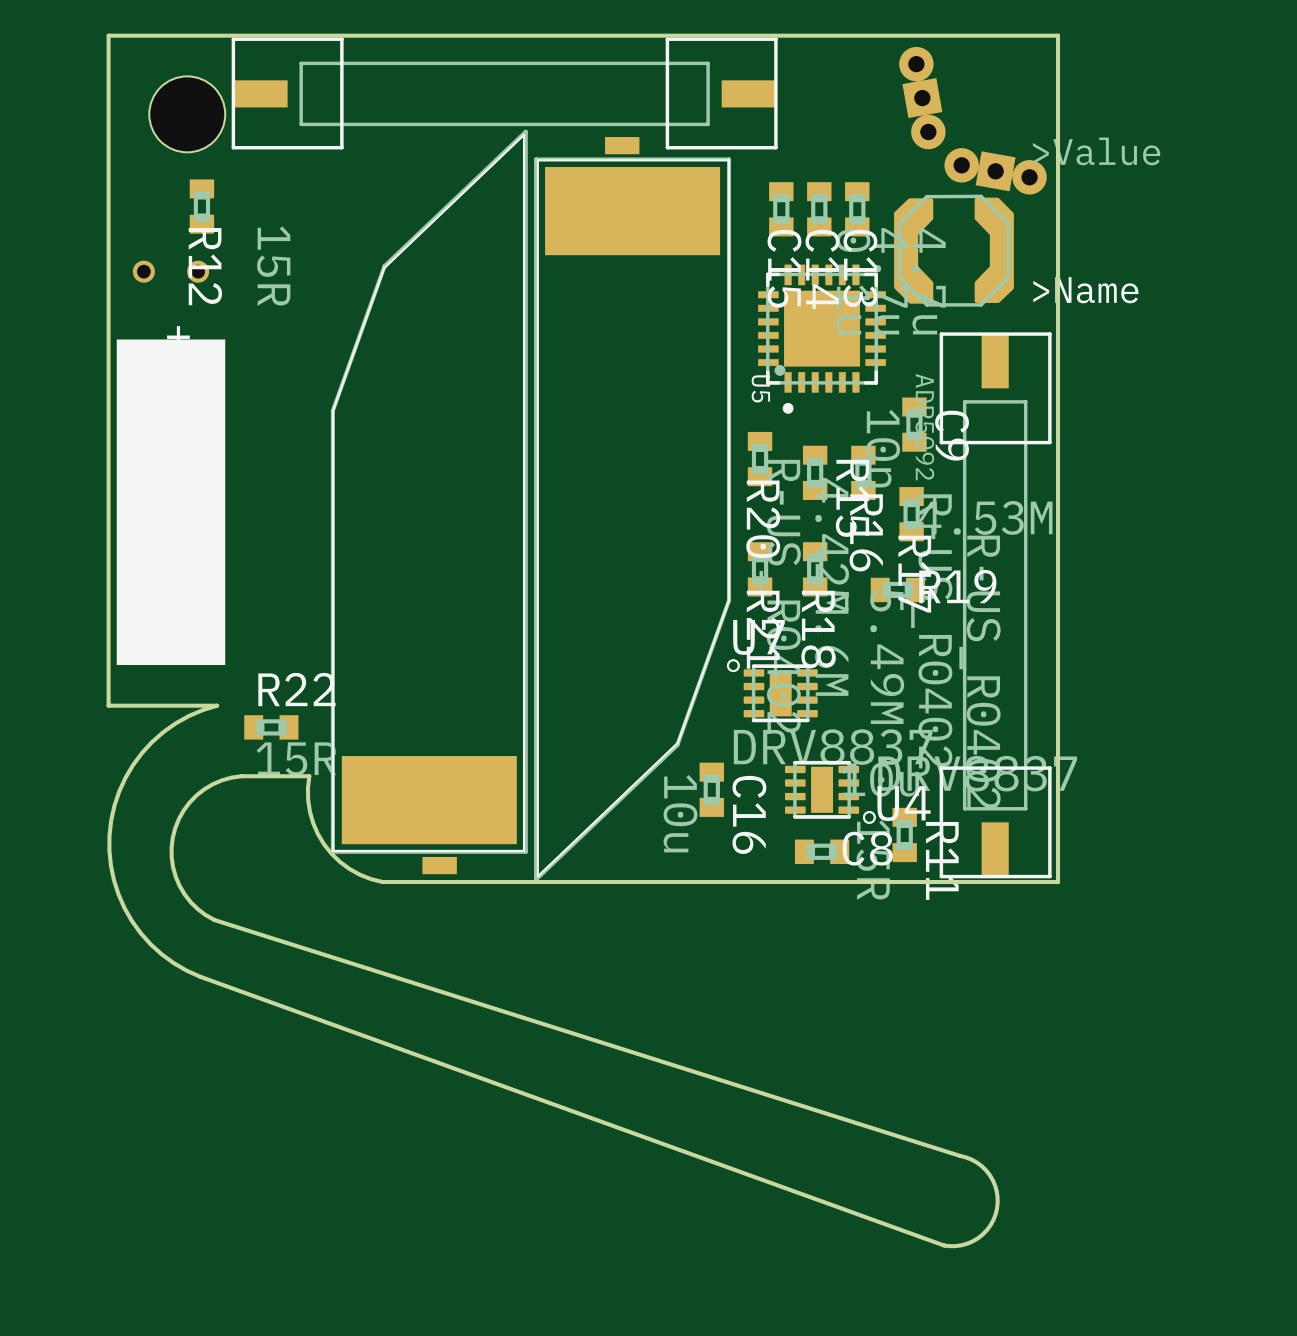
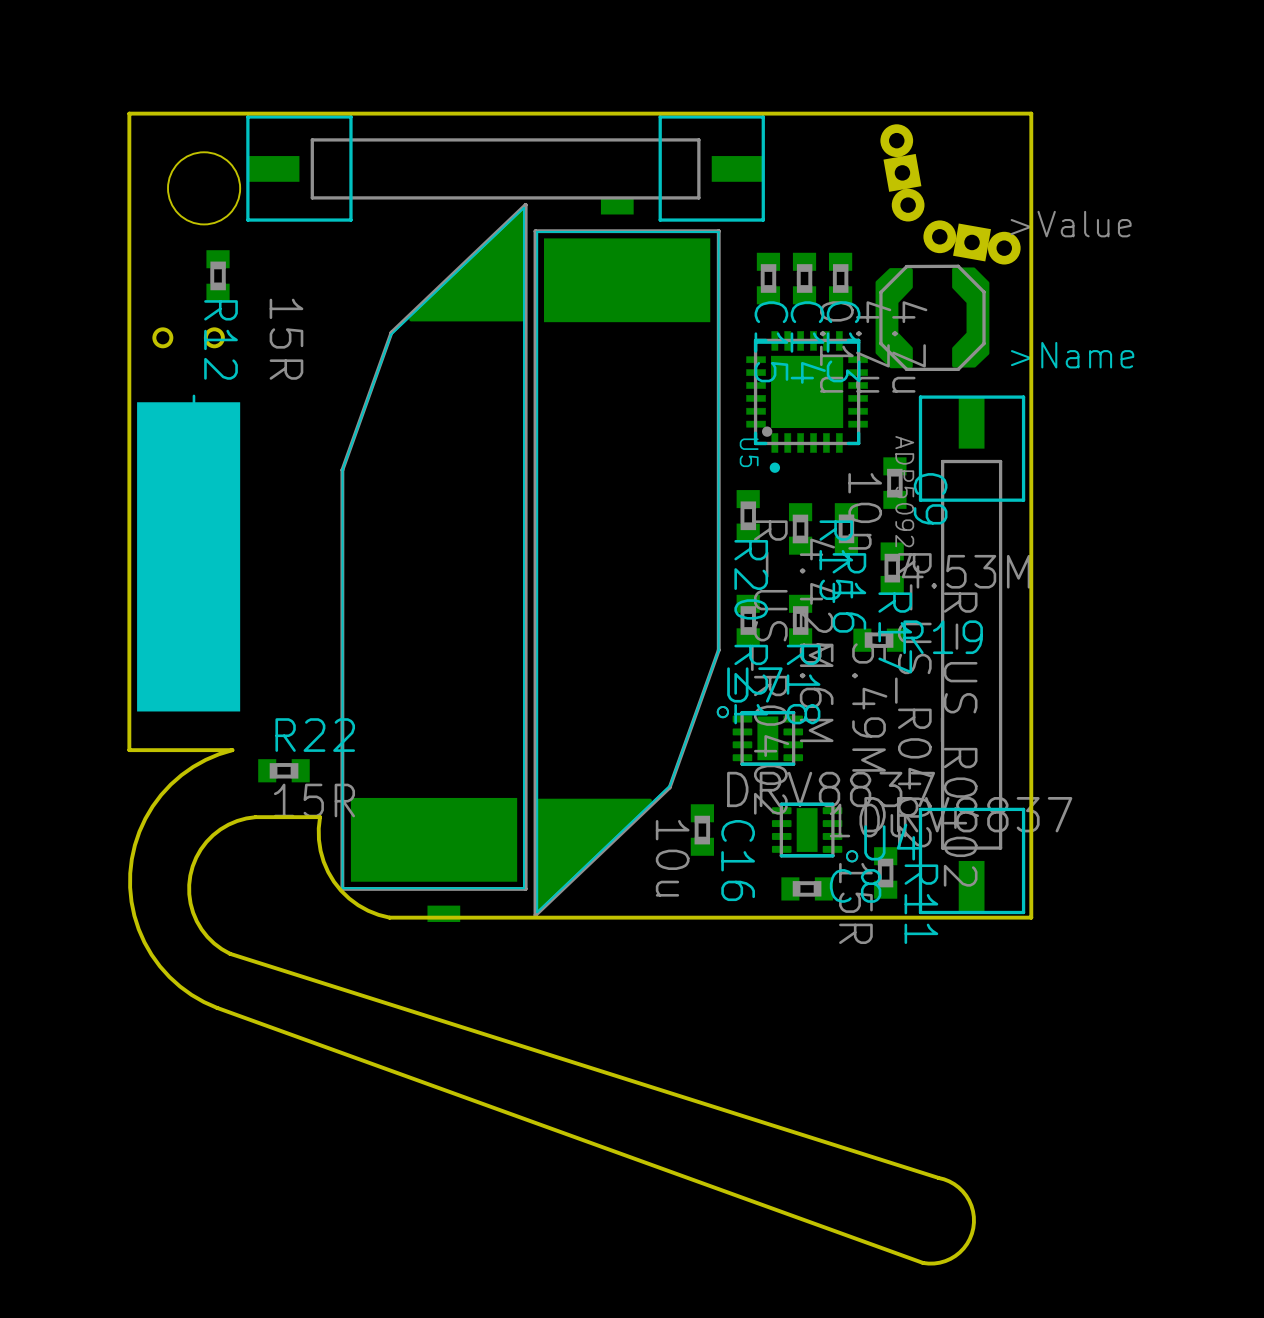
part footprint: [330, 129, 528, 875] -> [340, 202, 528, 922]
part footprint: [534, 137, 732, 882] -> [533, 198, 721, 918]

